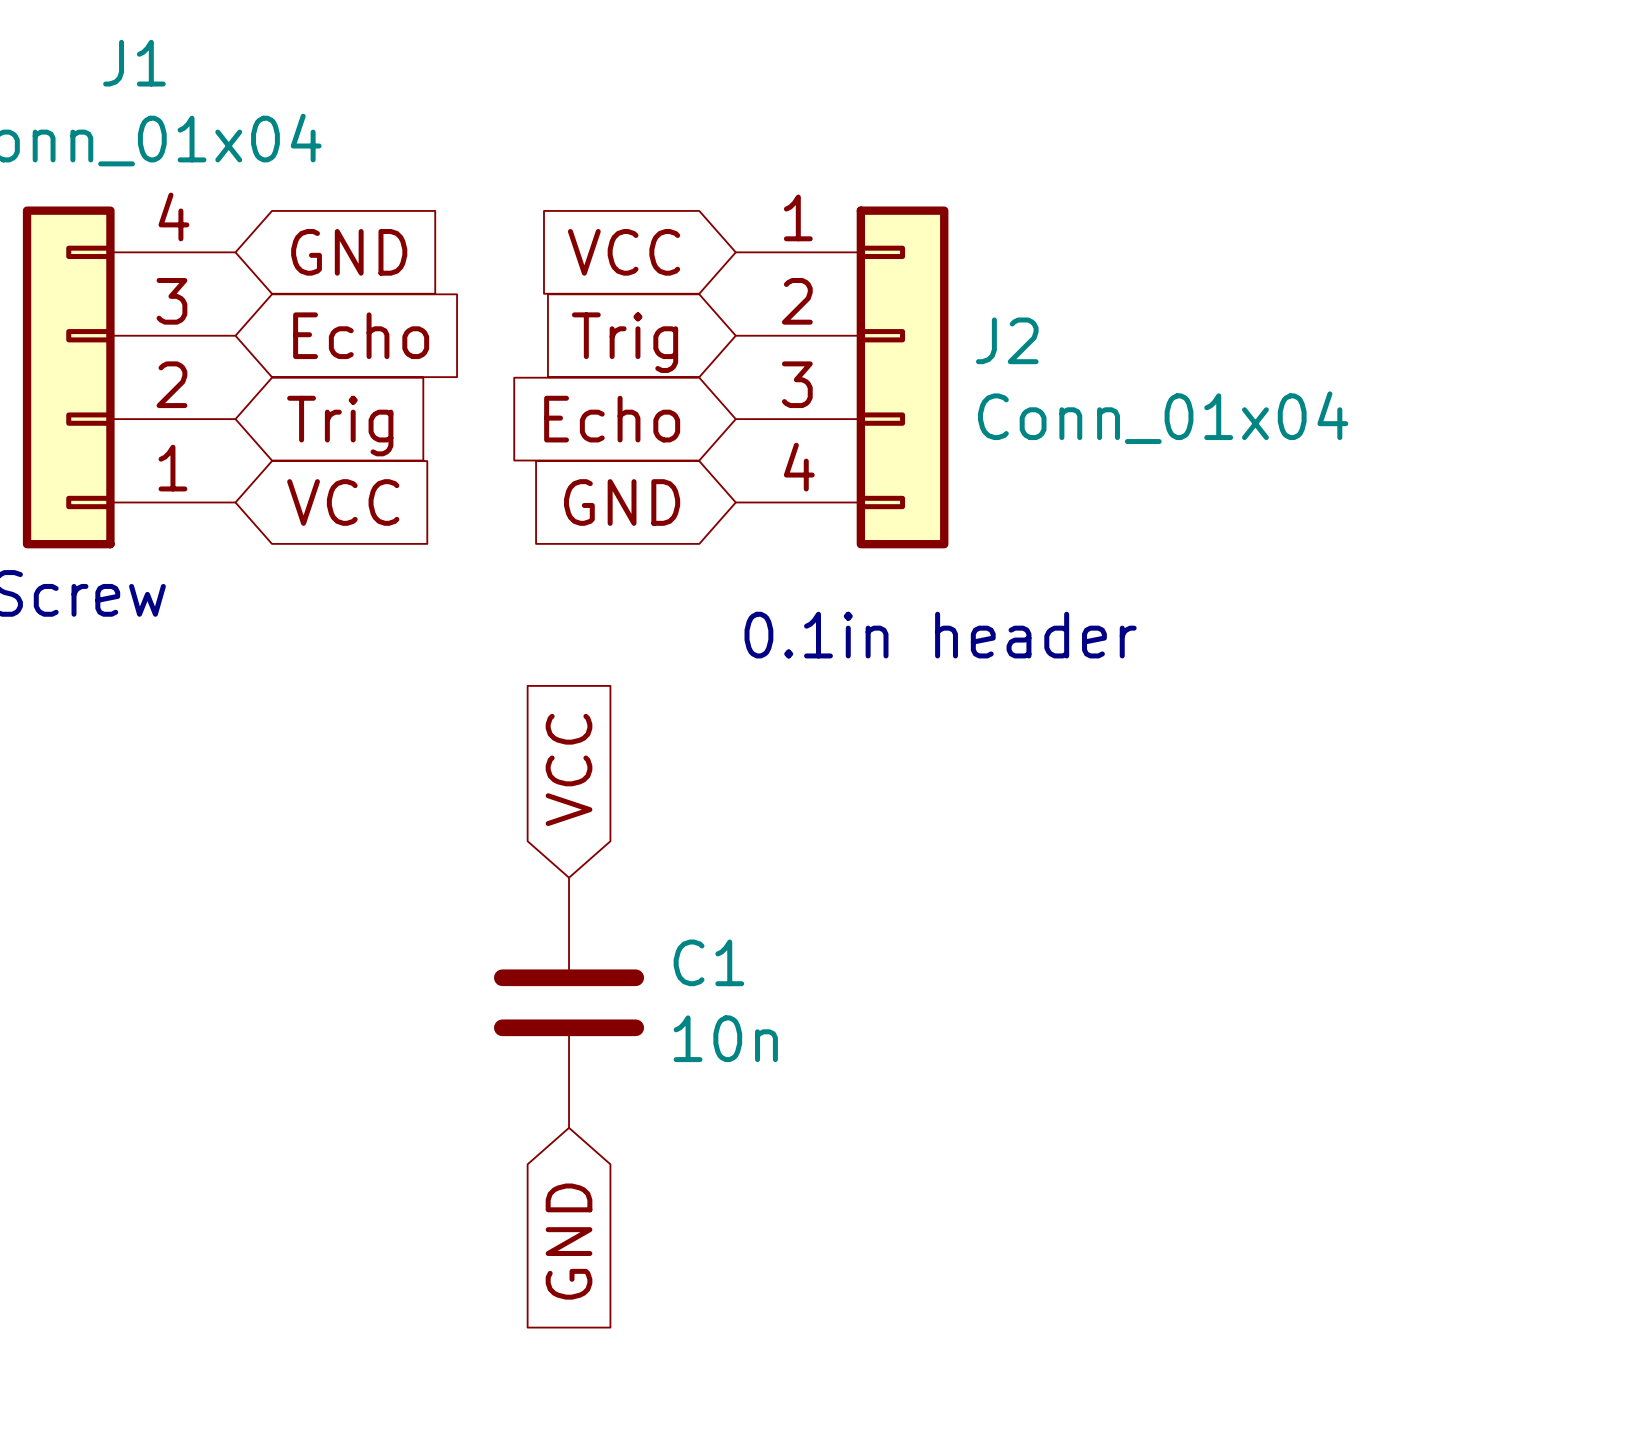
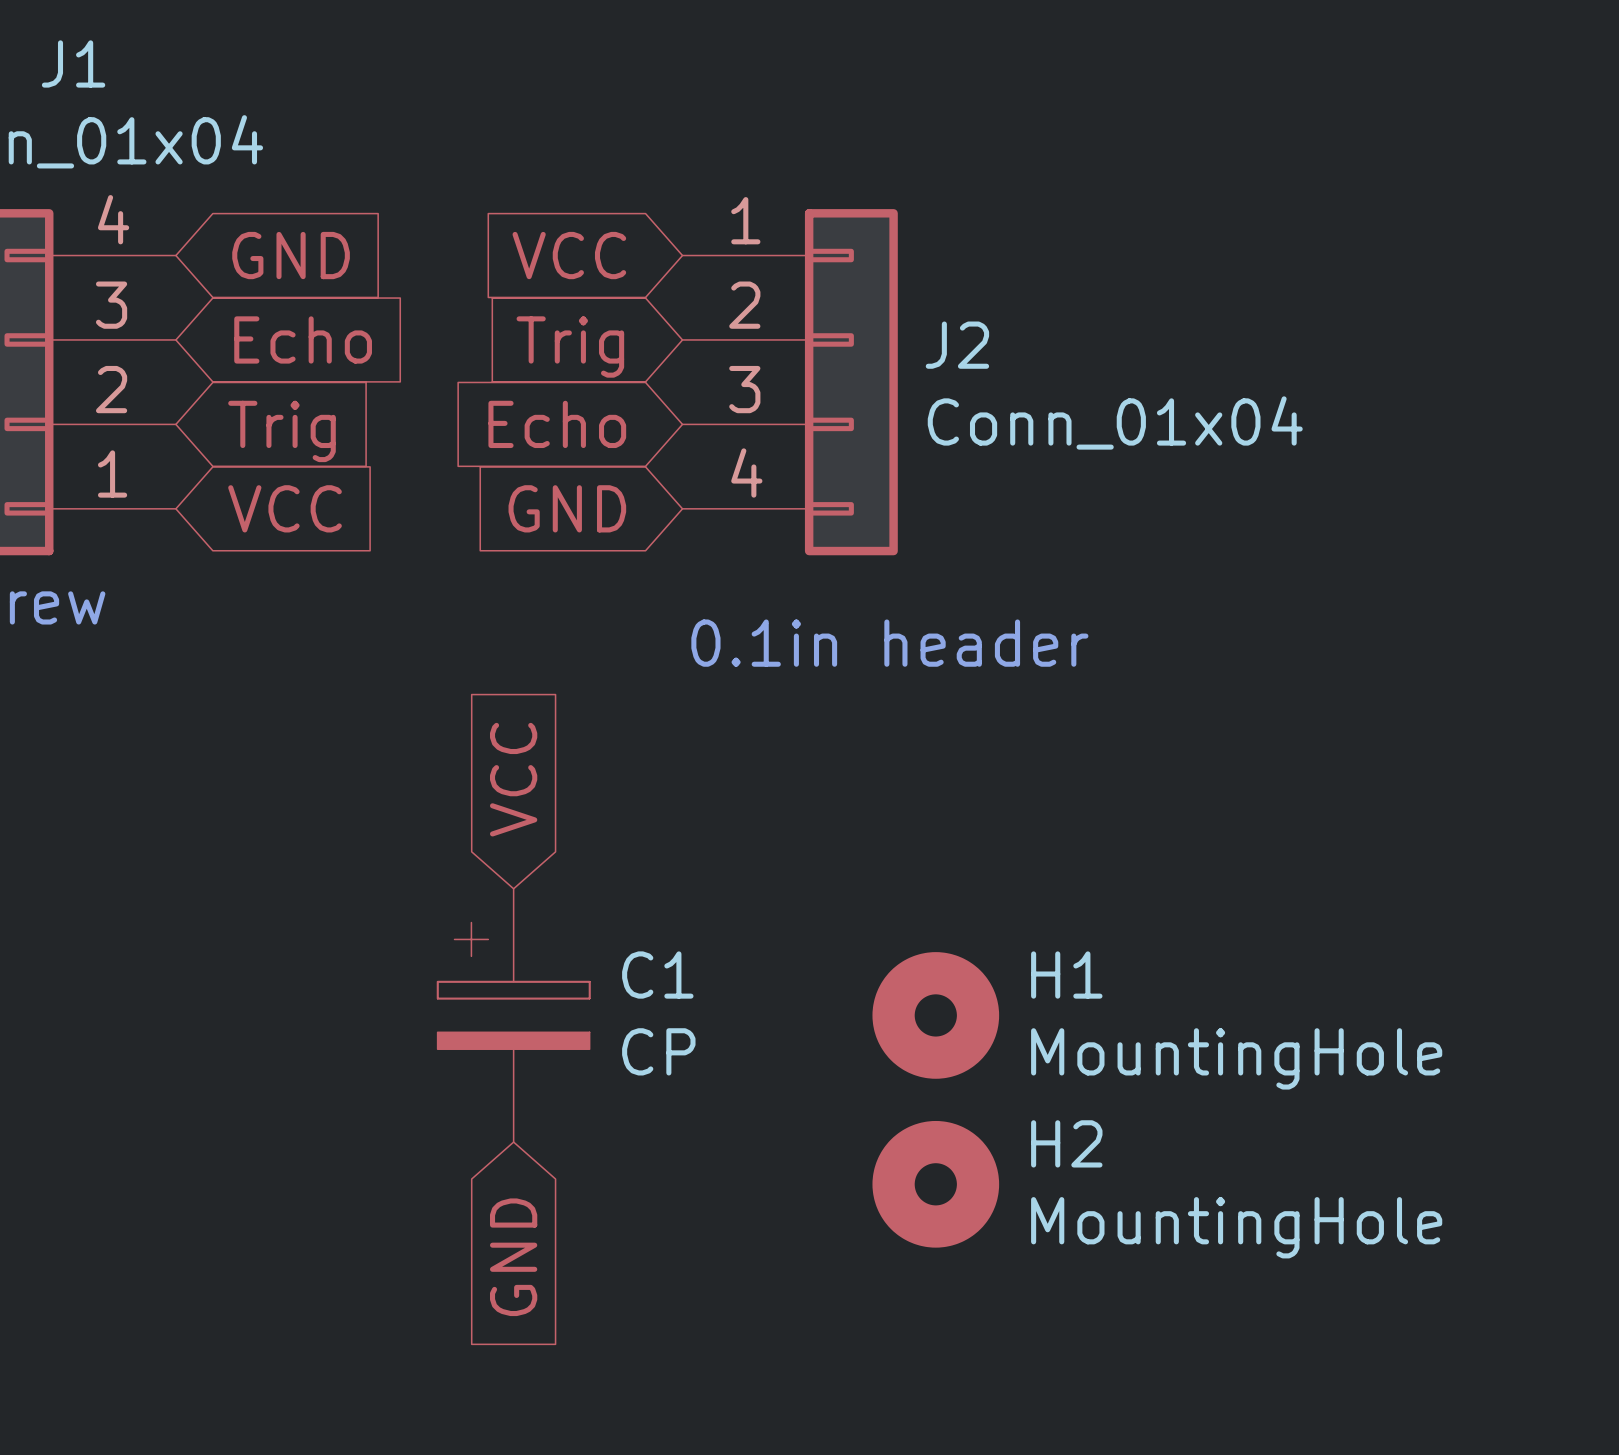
C1 symbol: [493, 877, 645, 1128] -> [437, 888, 590, 1143]
H1: none -> MountingHole (935, 1015)
C1 value: 10n (725, 1038) -> CP (658, 1051)
H2: none -> MountingHole (935, 1184)

